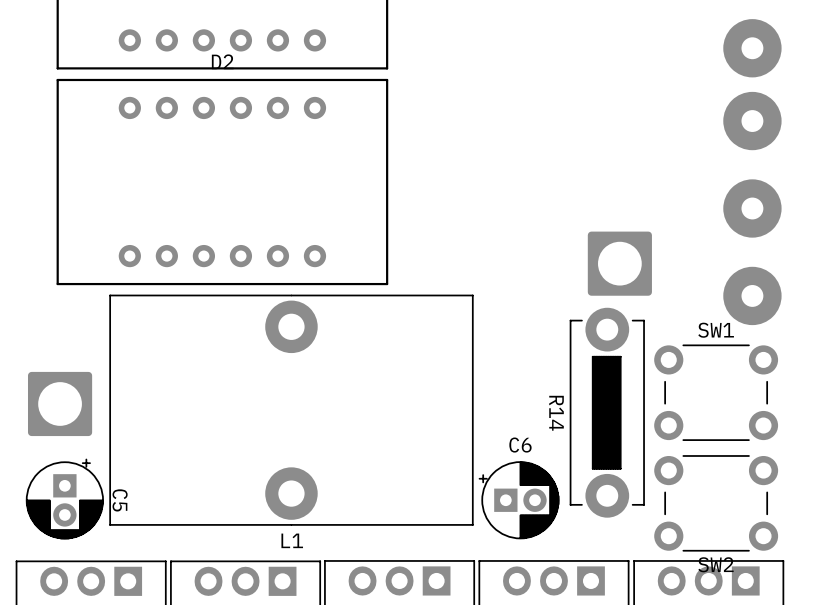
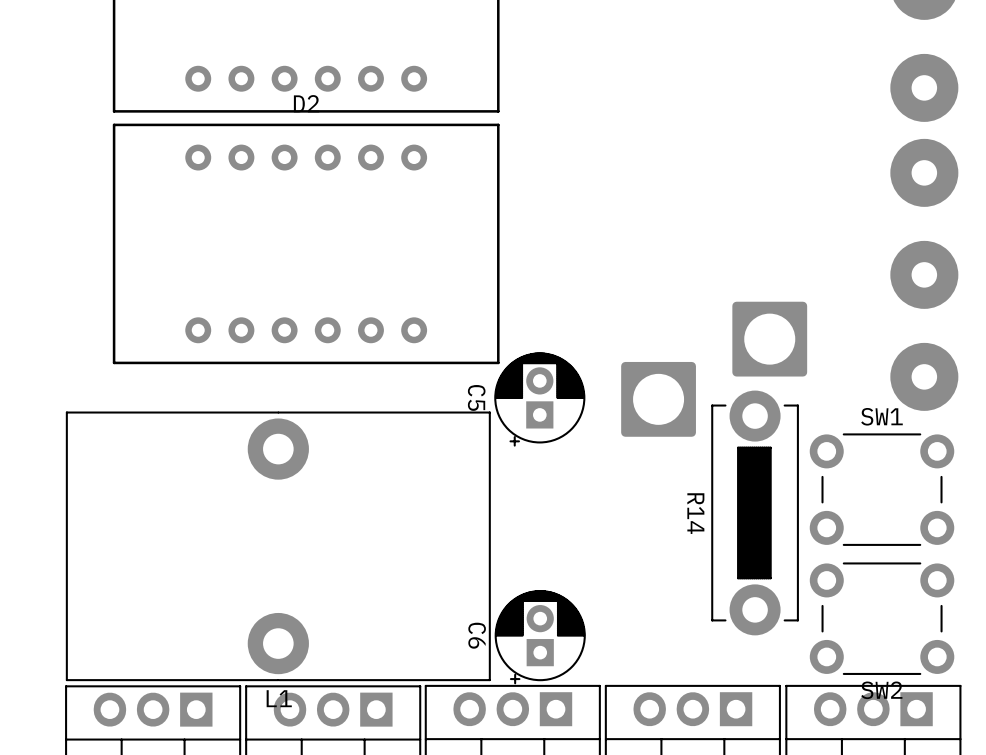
part: none -> (658, 399)
part: (60, 403) -> none
L1 position: (291, 410) -> (278, 546)
C5 rotation: 0° (64, 499) -> 180° (539, 399)
C5 position: (64, 499) -> (539, 399)
C6 rotation: 0° (519, 500) -> 90° counterclockwise (540, 637)
C6 position: (519, 500) -> (540, 637)

